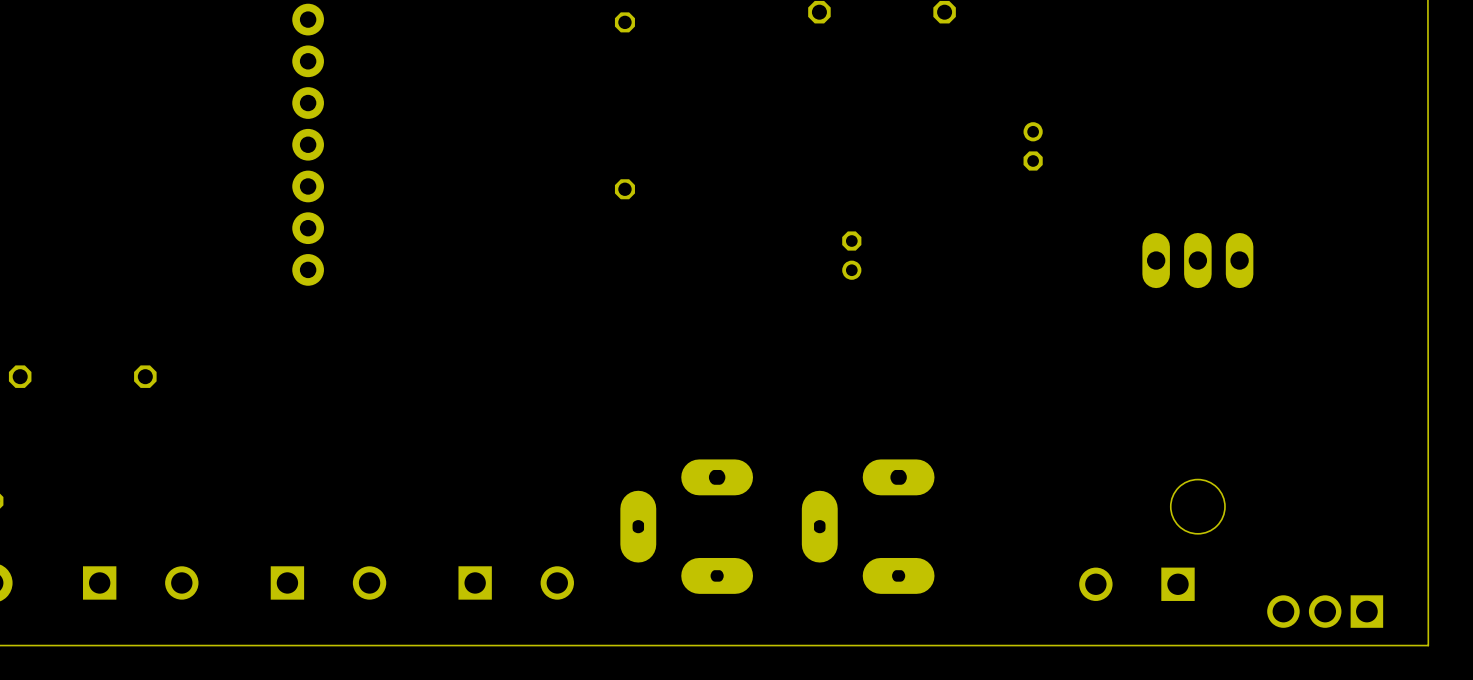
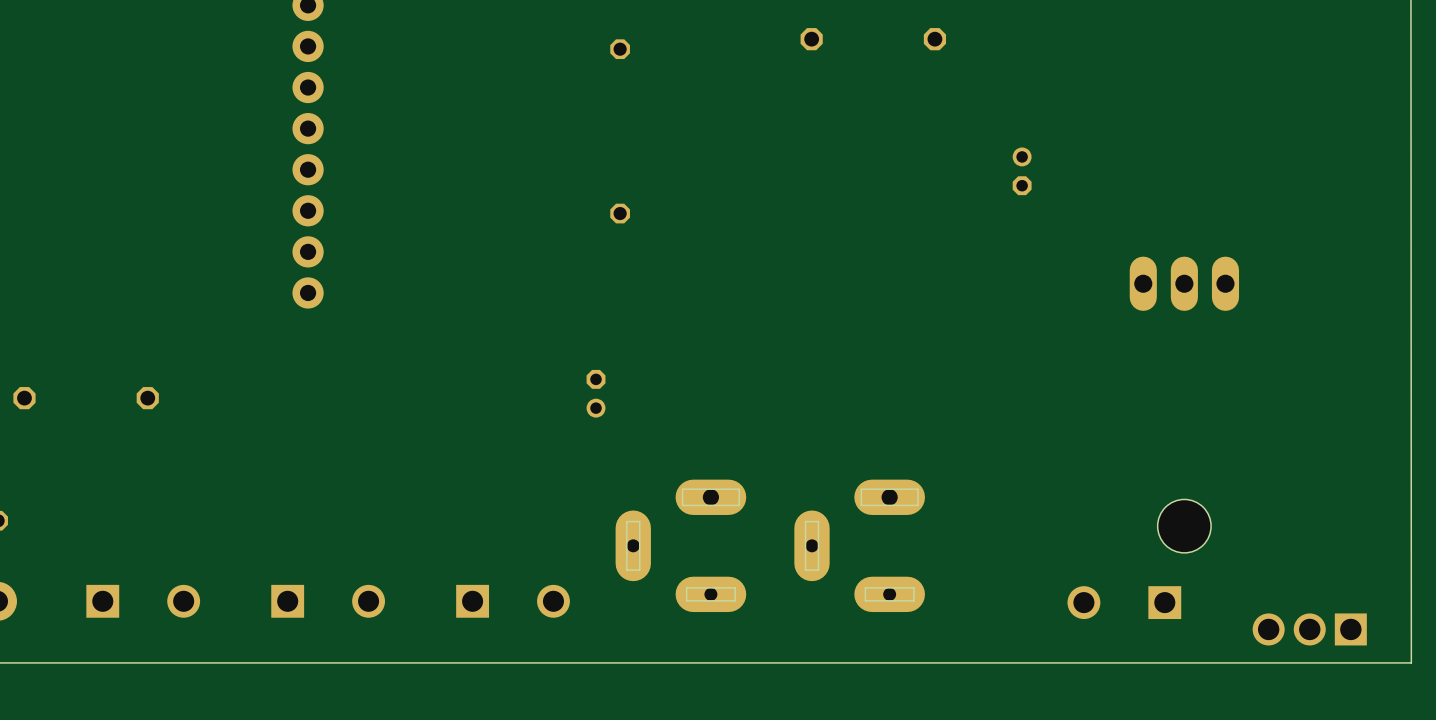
part position: (851, 255) -> (596, 393)

